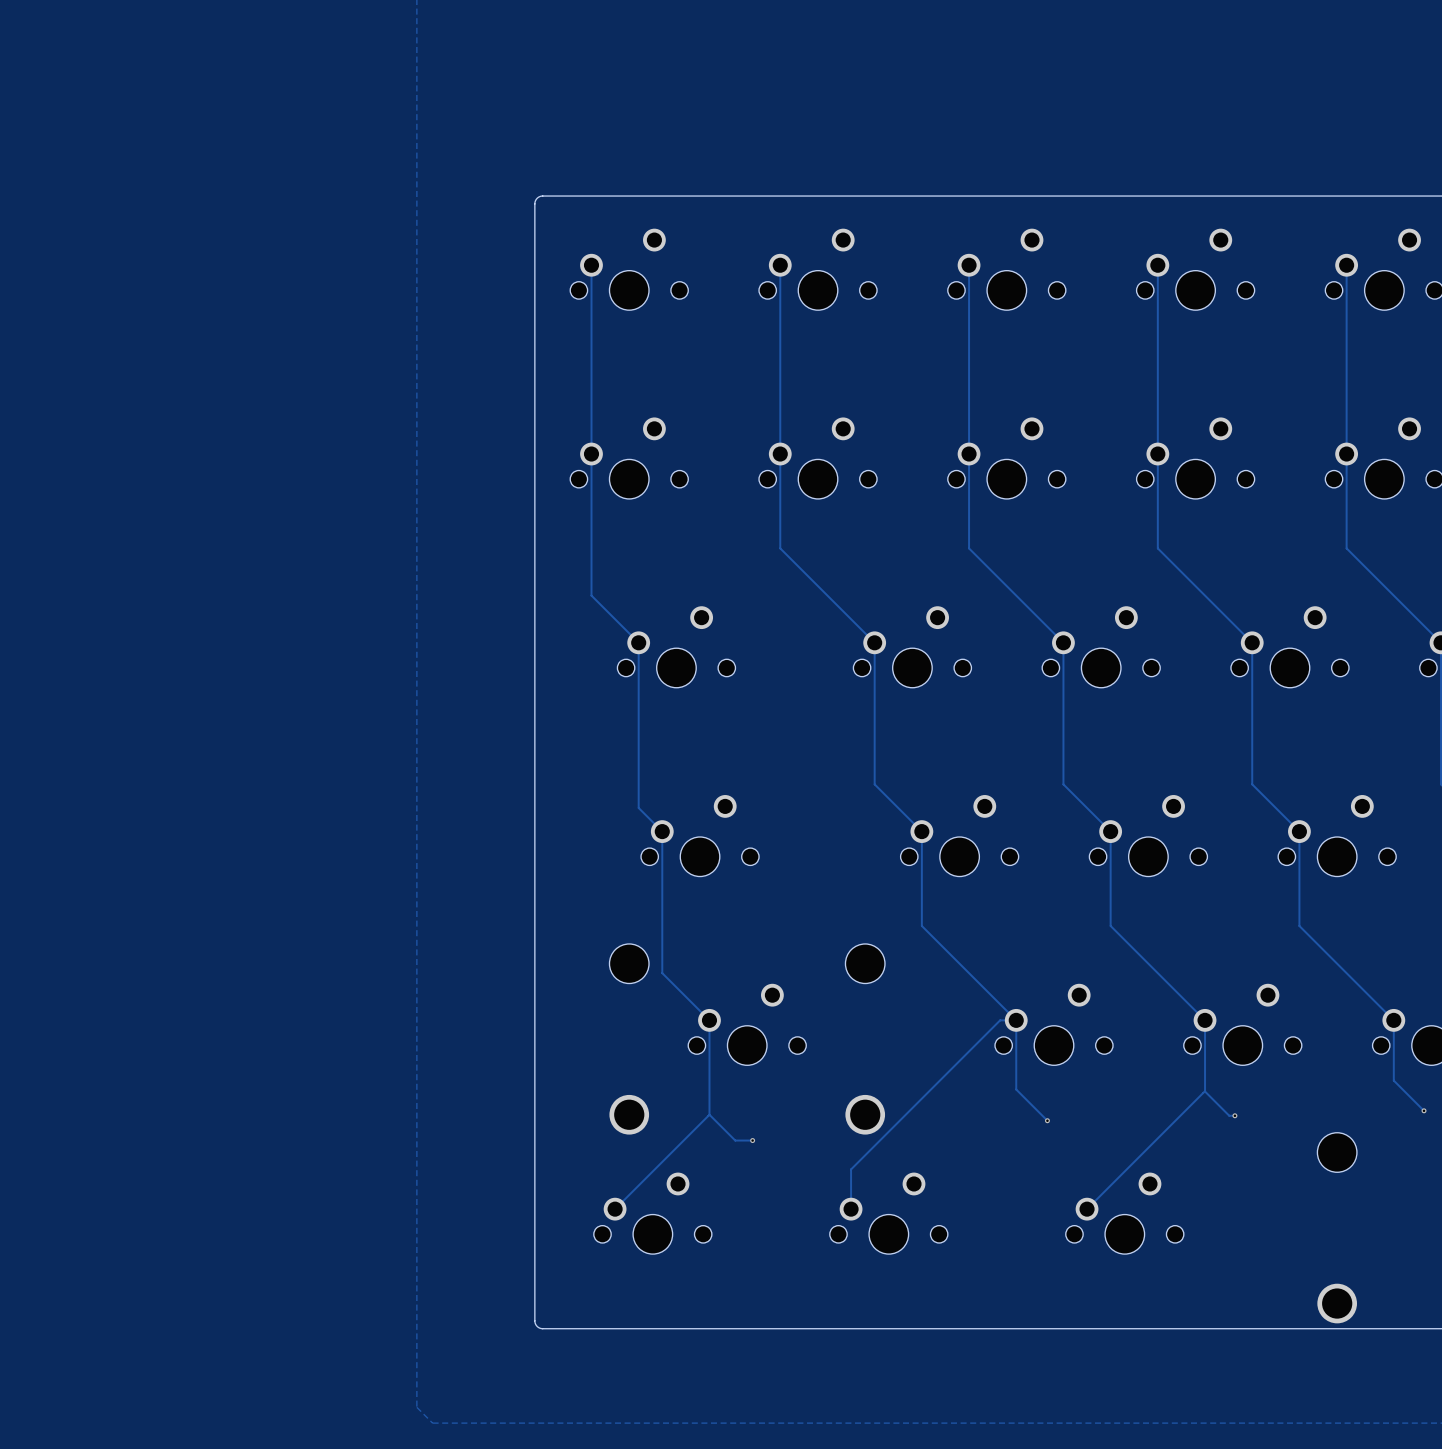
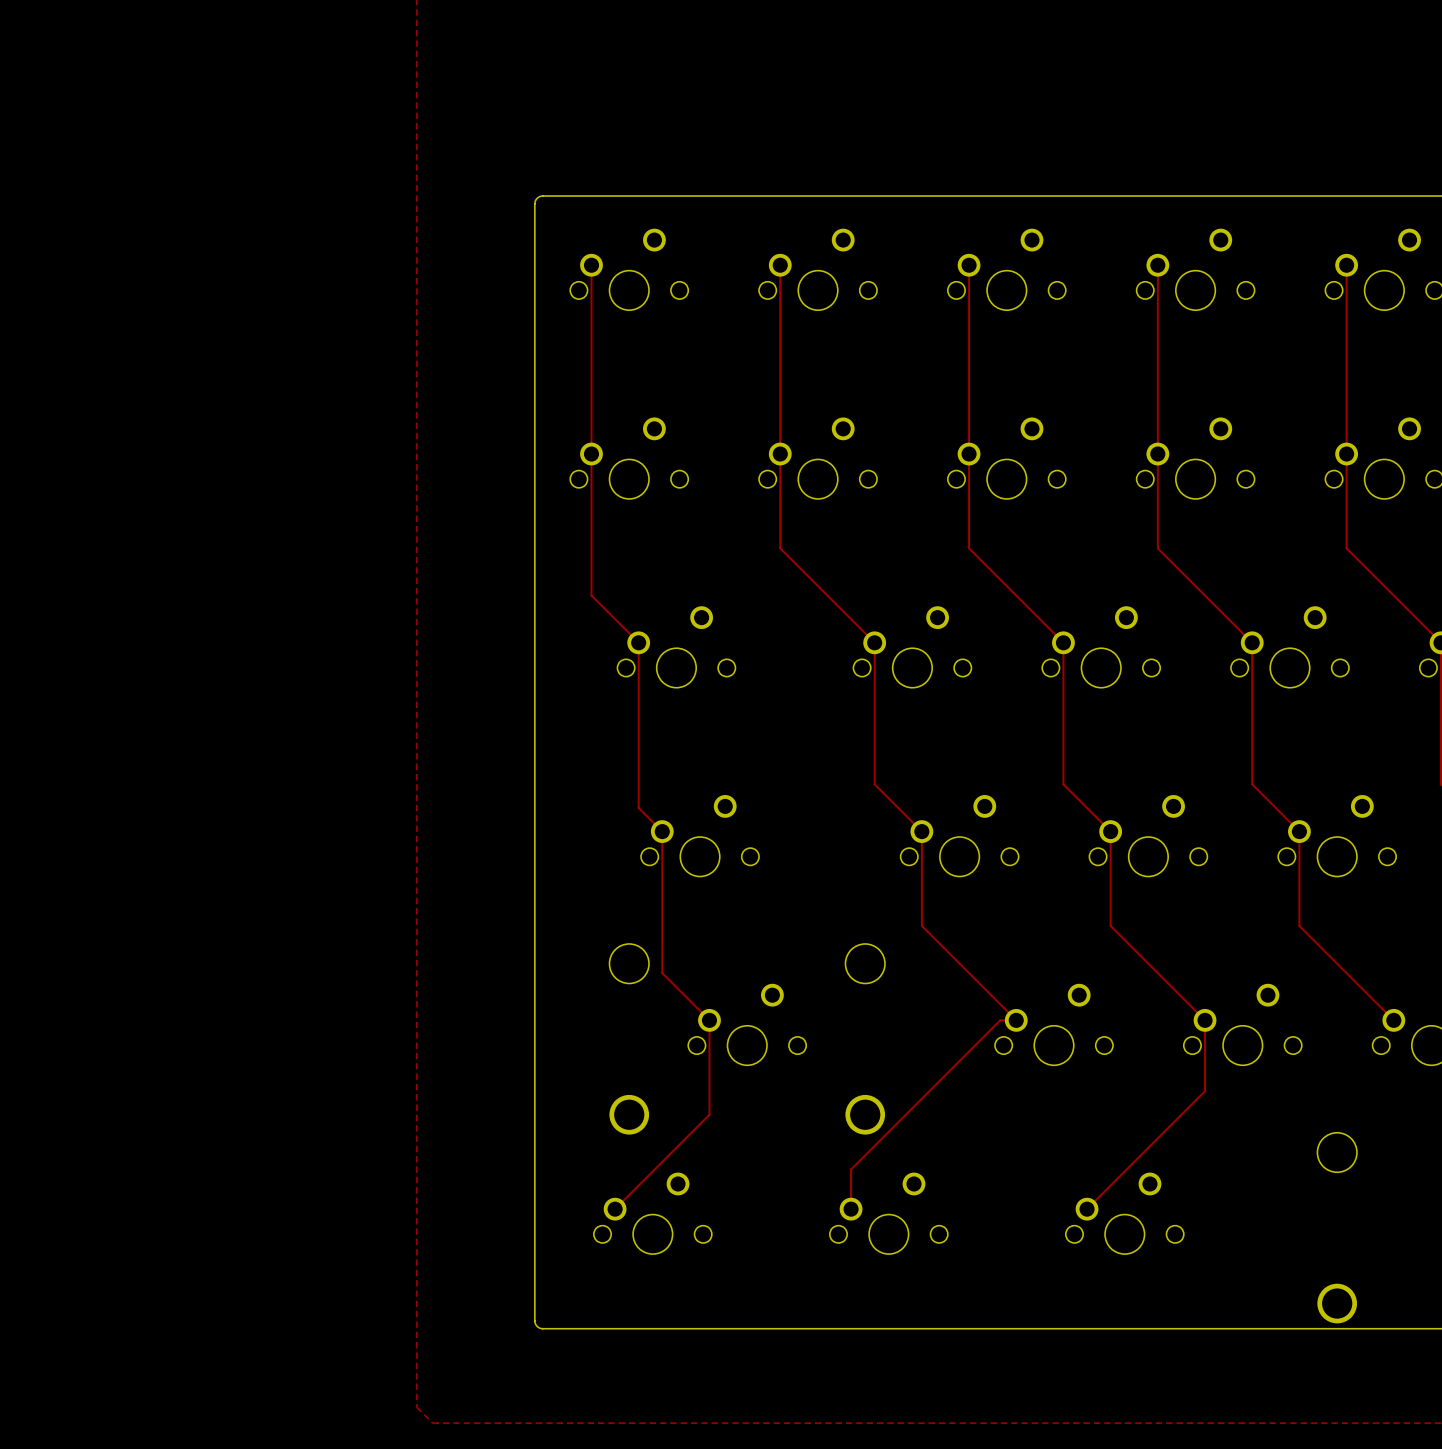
track: (1016, 1020) (1016, 1089) (1047, 1120) -> none
track: (1393, 1020) (1393, 1080) (1424, 1110) -> none
track: (1205, 1091) (1229, 1115) (1234, 1115) -> none
via: (1424, 1110) -> none
track: (709, 1114) (735, 1140) (752, 1140) -> none
via: (1234, 1115) -> none
via: (1047, 1120) -> none
via: (752, 1140) -> none

